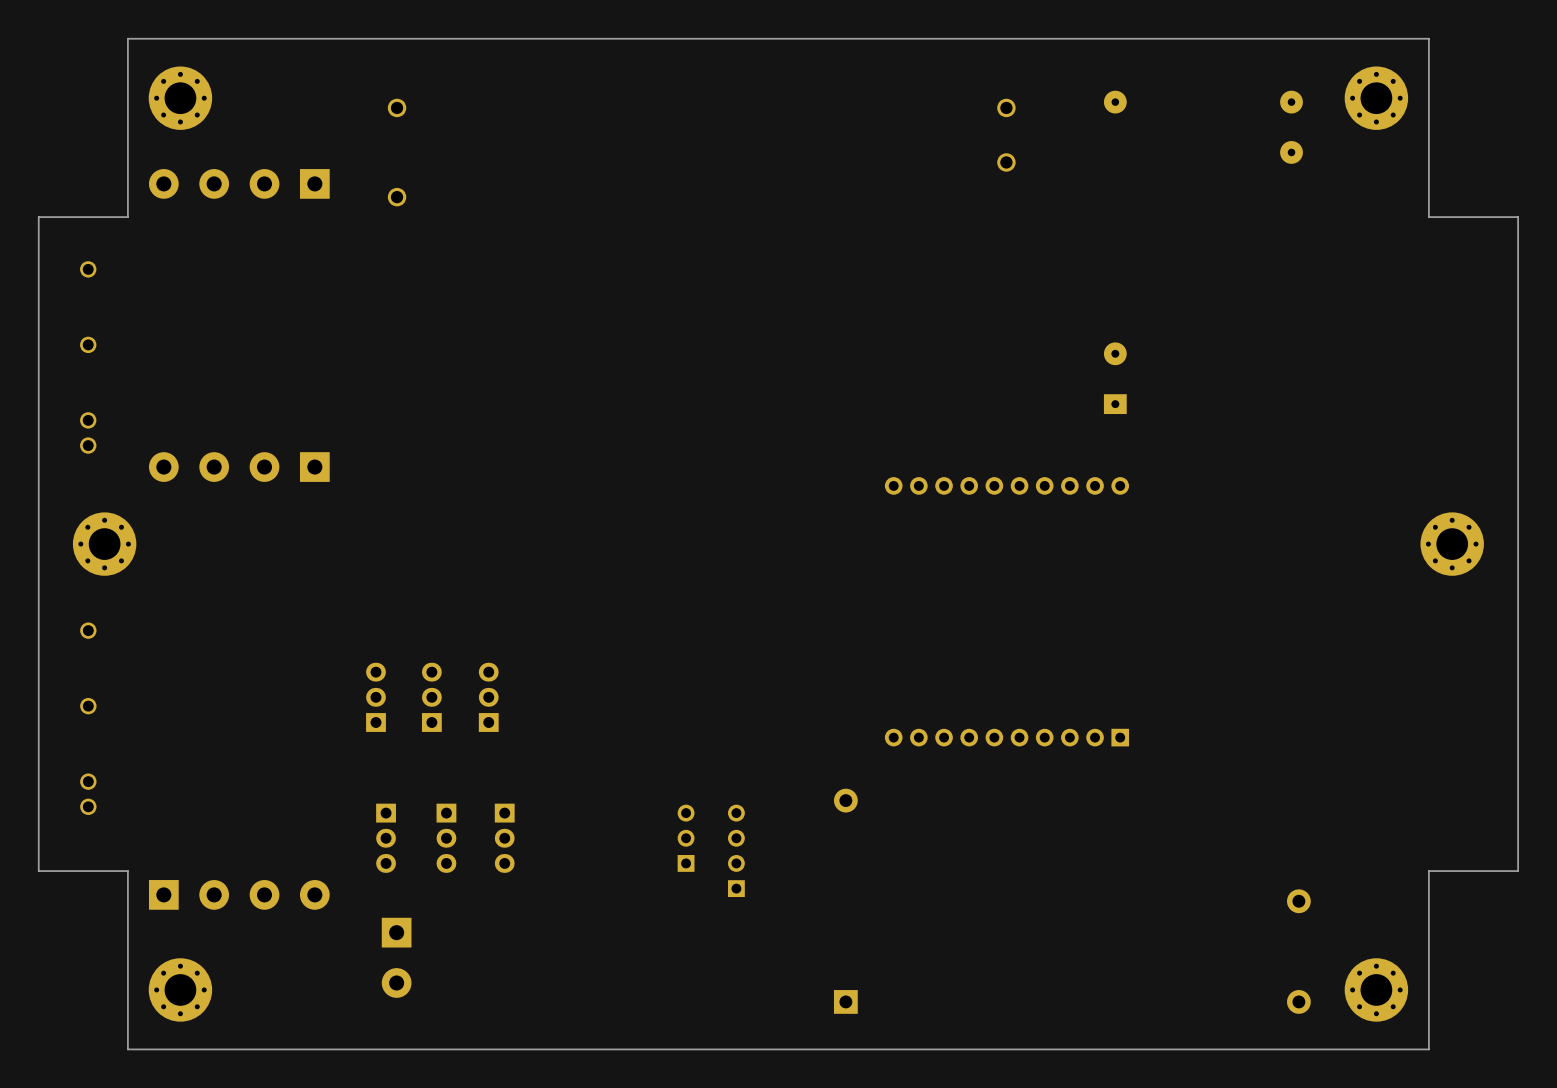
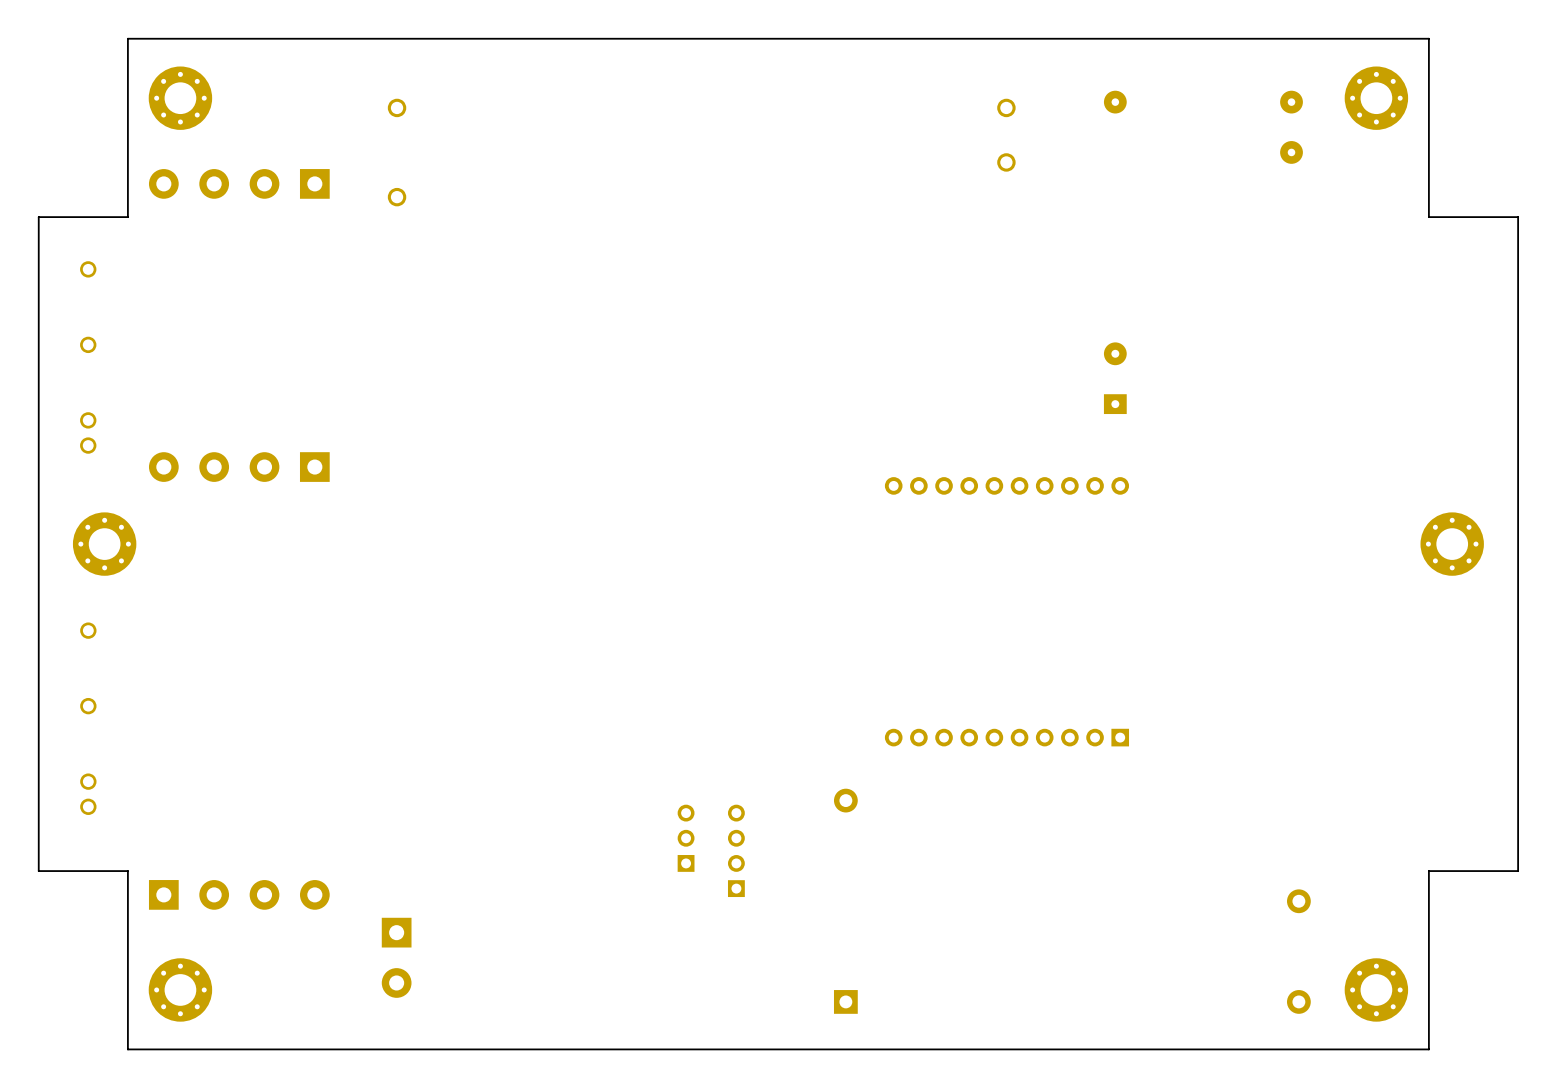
part: (375, 697) -> none
part: (431, 697) -> none
part: (488, 697) -> none
part: (386, 838) -> none
part: (446, 838) -> none
part: (504, 838) -> none

